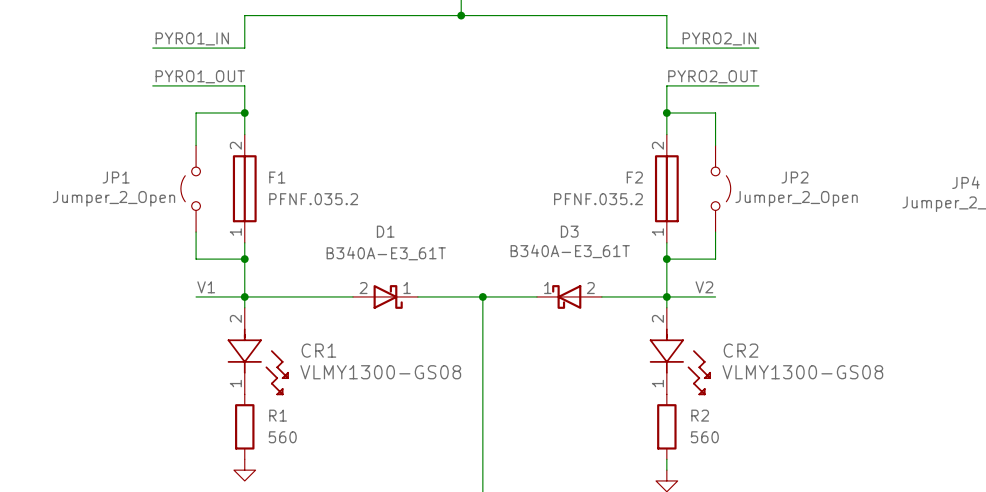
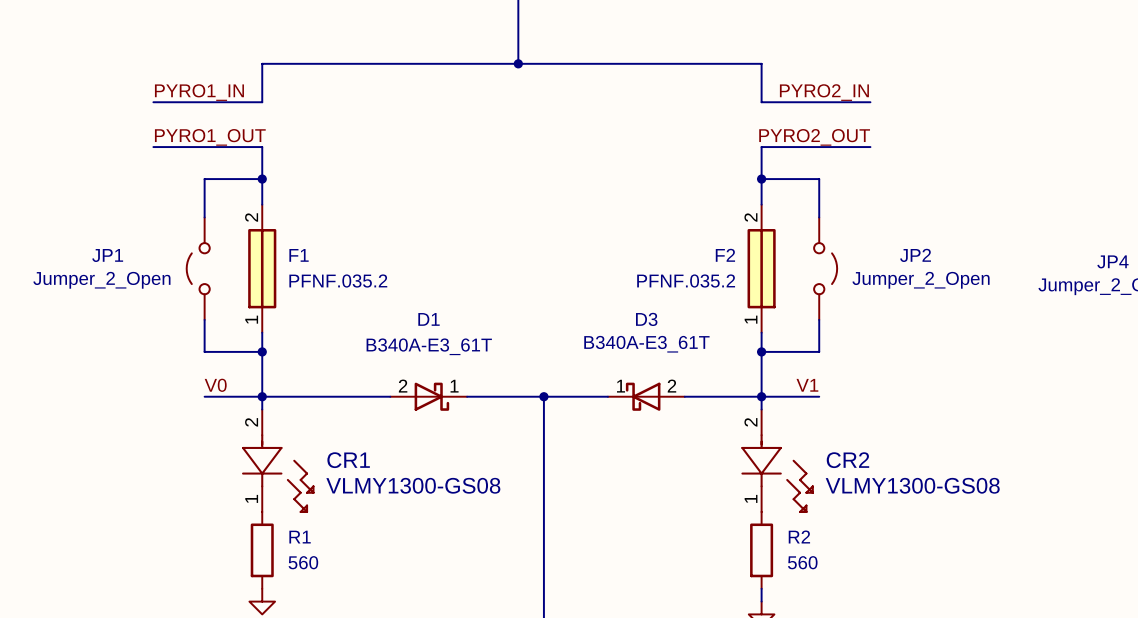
label: V1 (206, 287) -> V0 (215, 385)
label: V2 (704, 287) -> V1 (807, 385)

